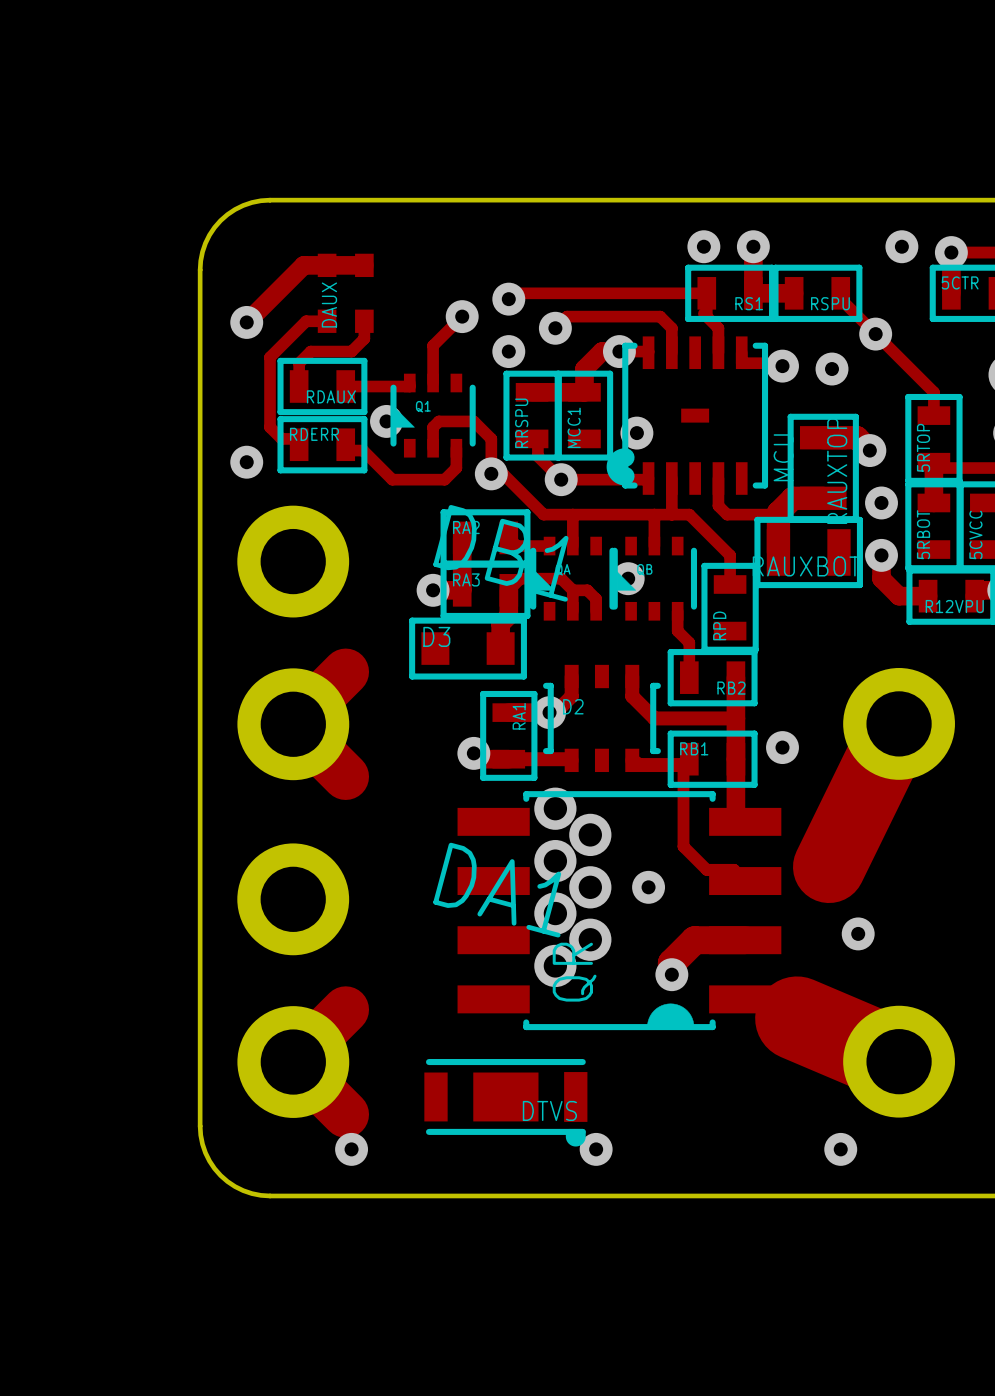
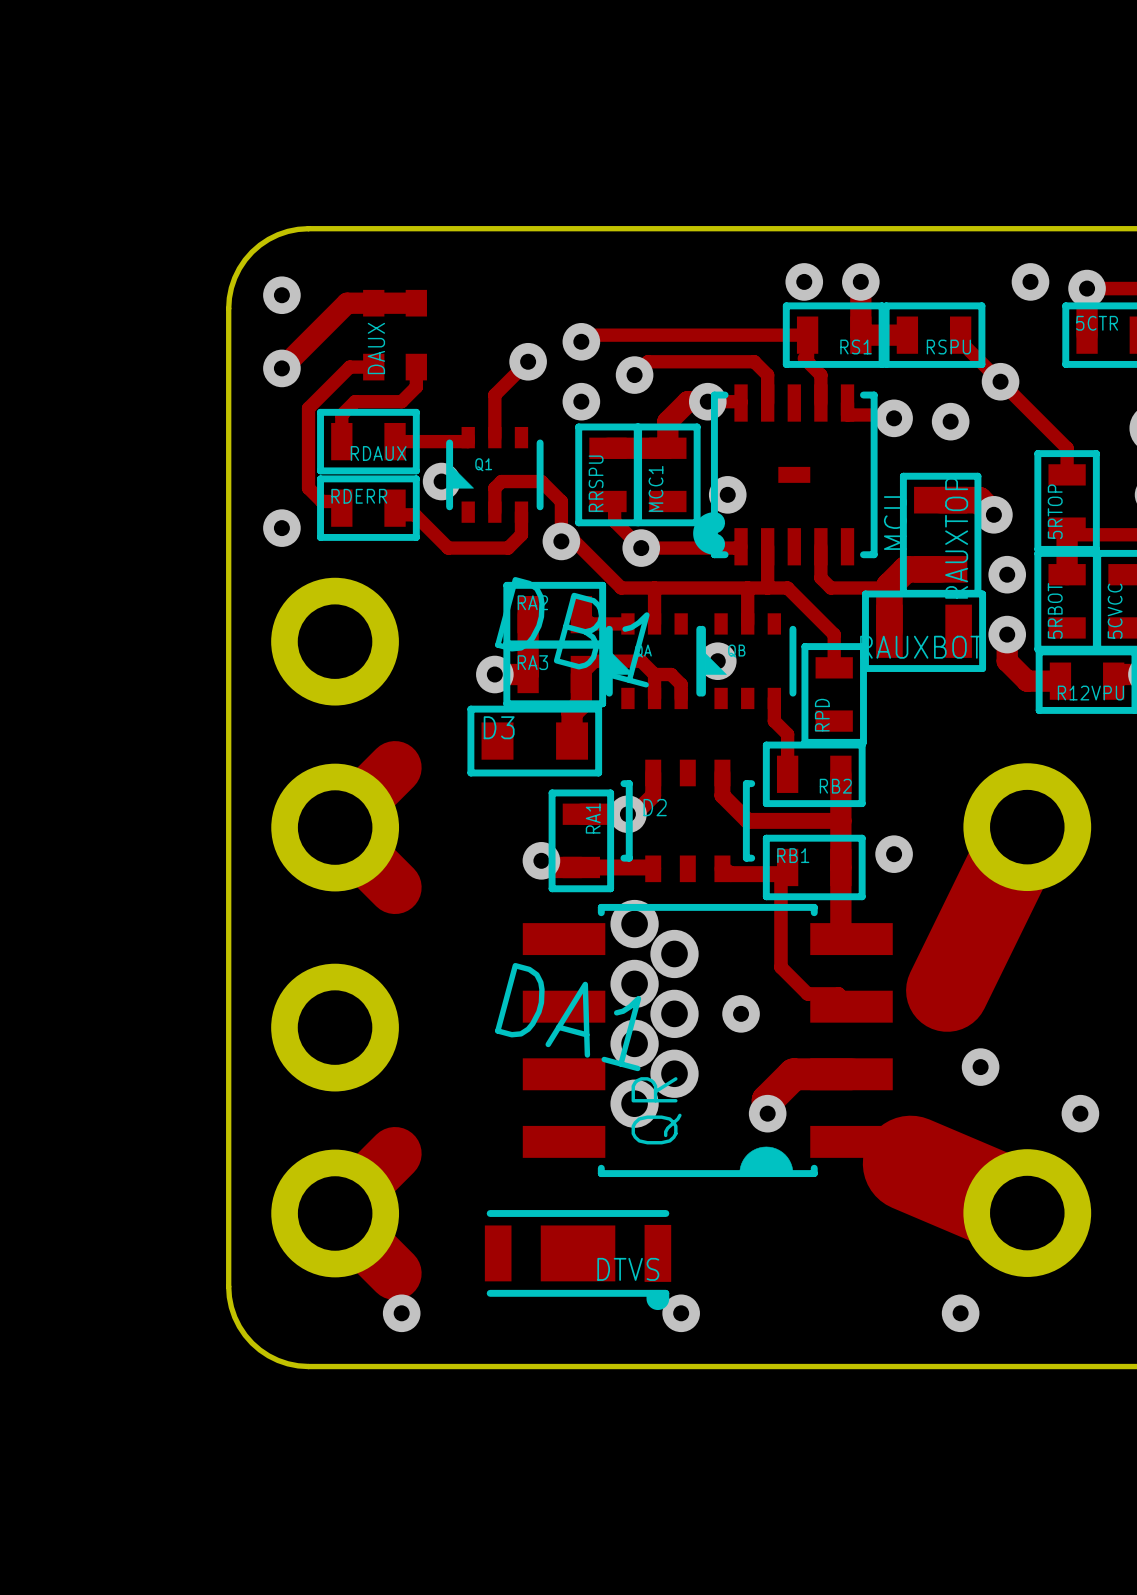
via: none -> (281, 295)
via: none -> (1080, 1113)

